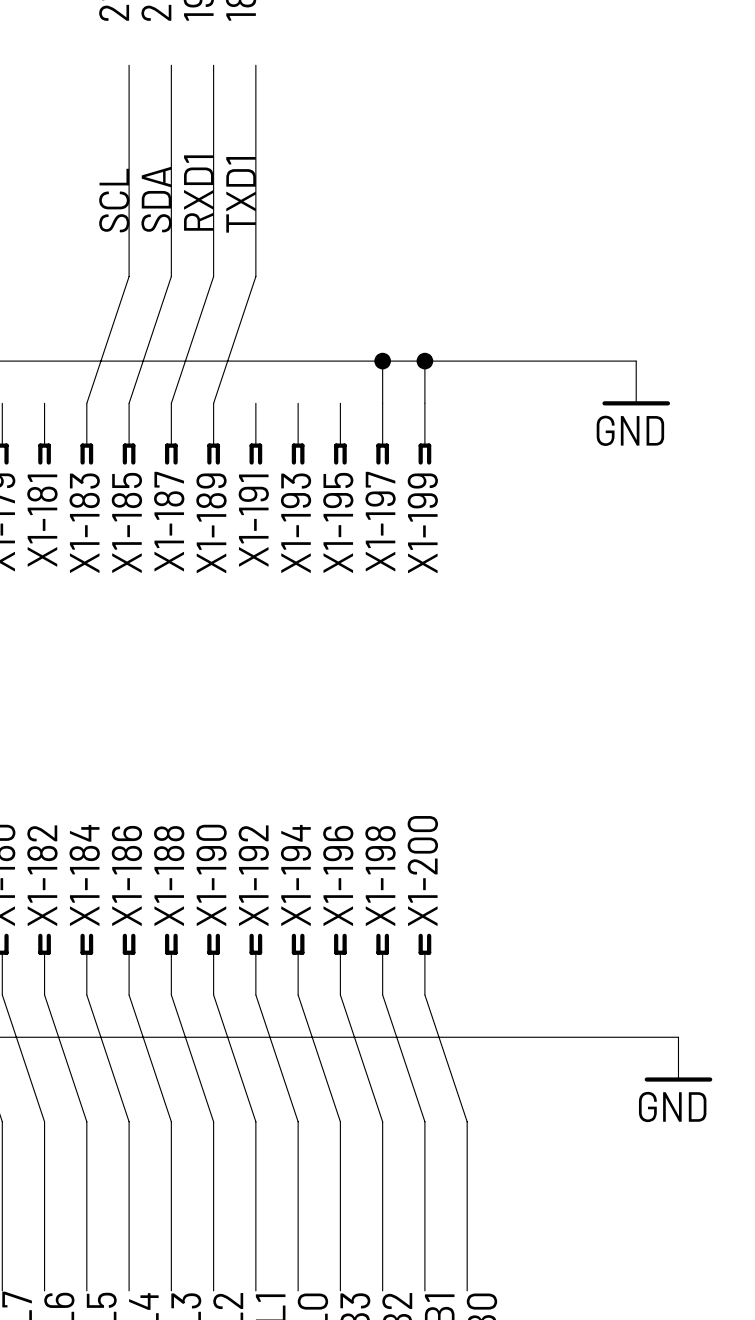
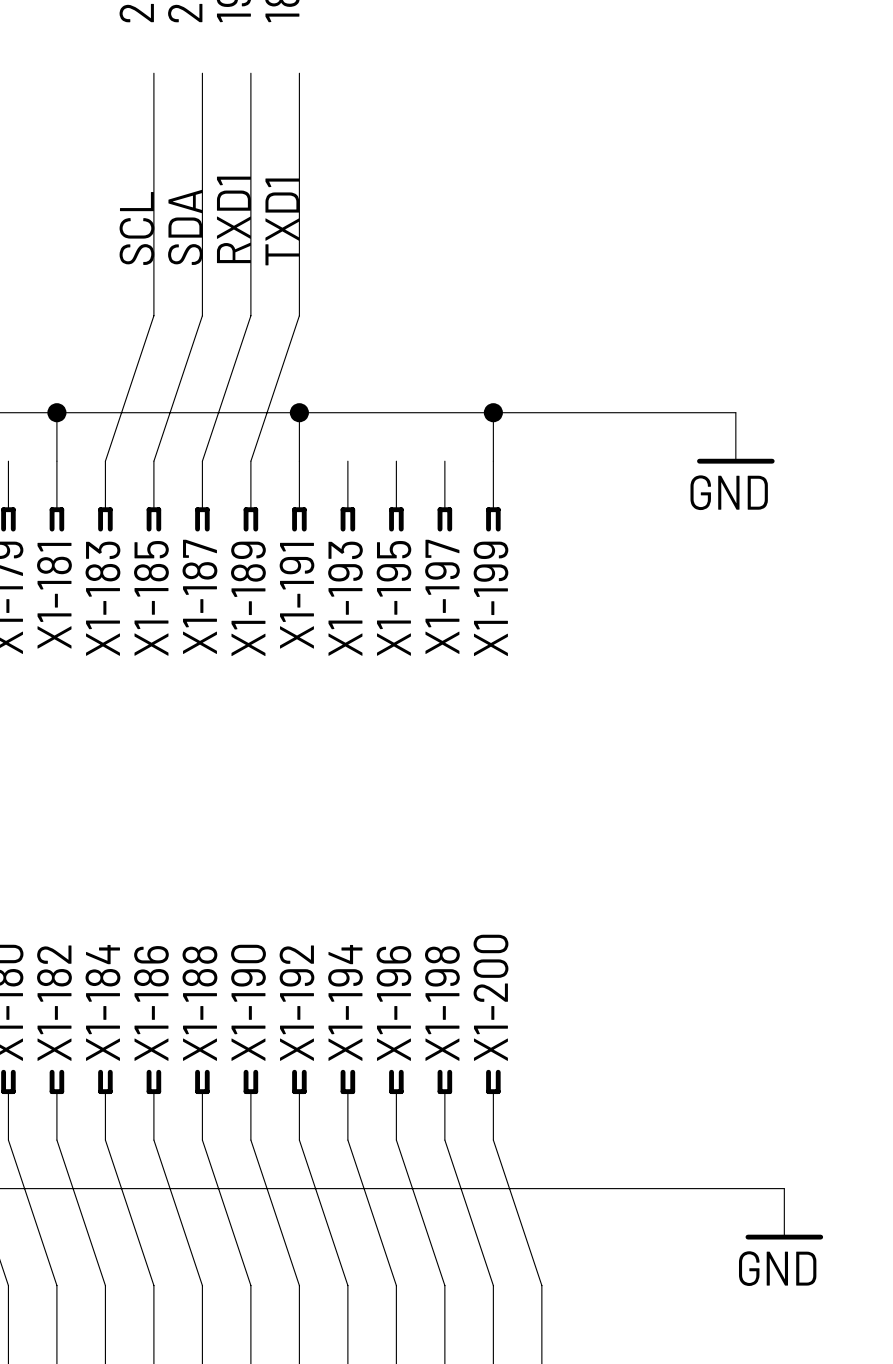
wire: none -> (56, 412) (56, 461)
junction: none -> (56, 412)
junction: none -> (299, 412)
wire: (382, 361) (382, 403) -> (299, 412) (299, 461)
junction: (382, 361) -> none

